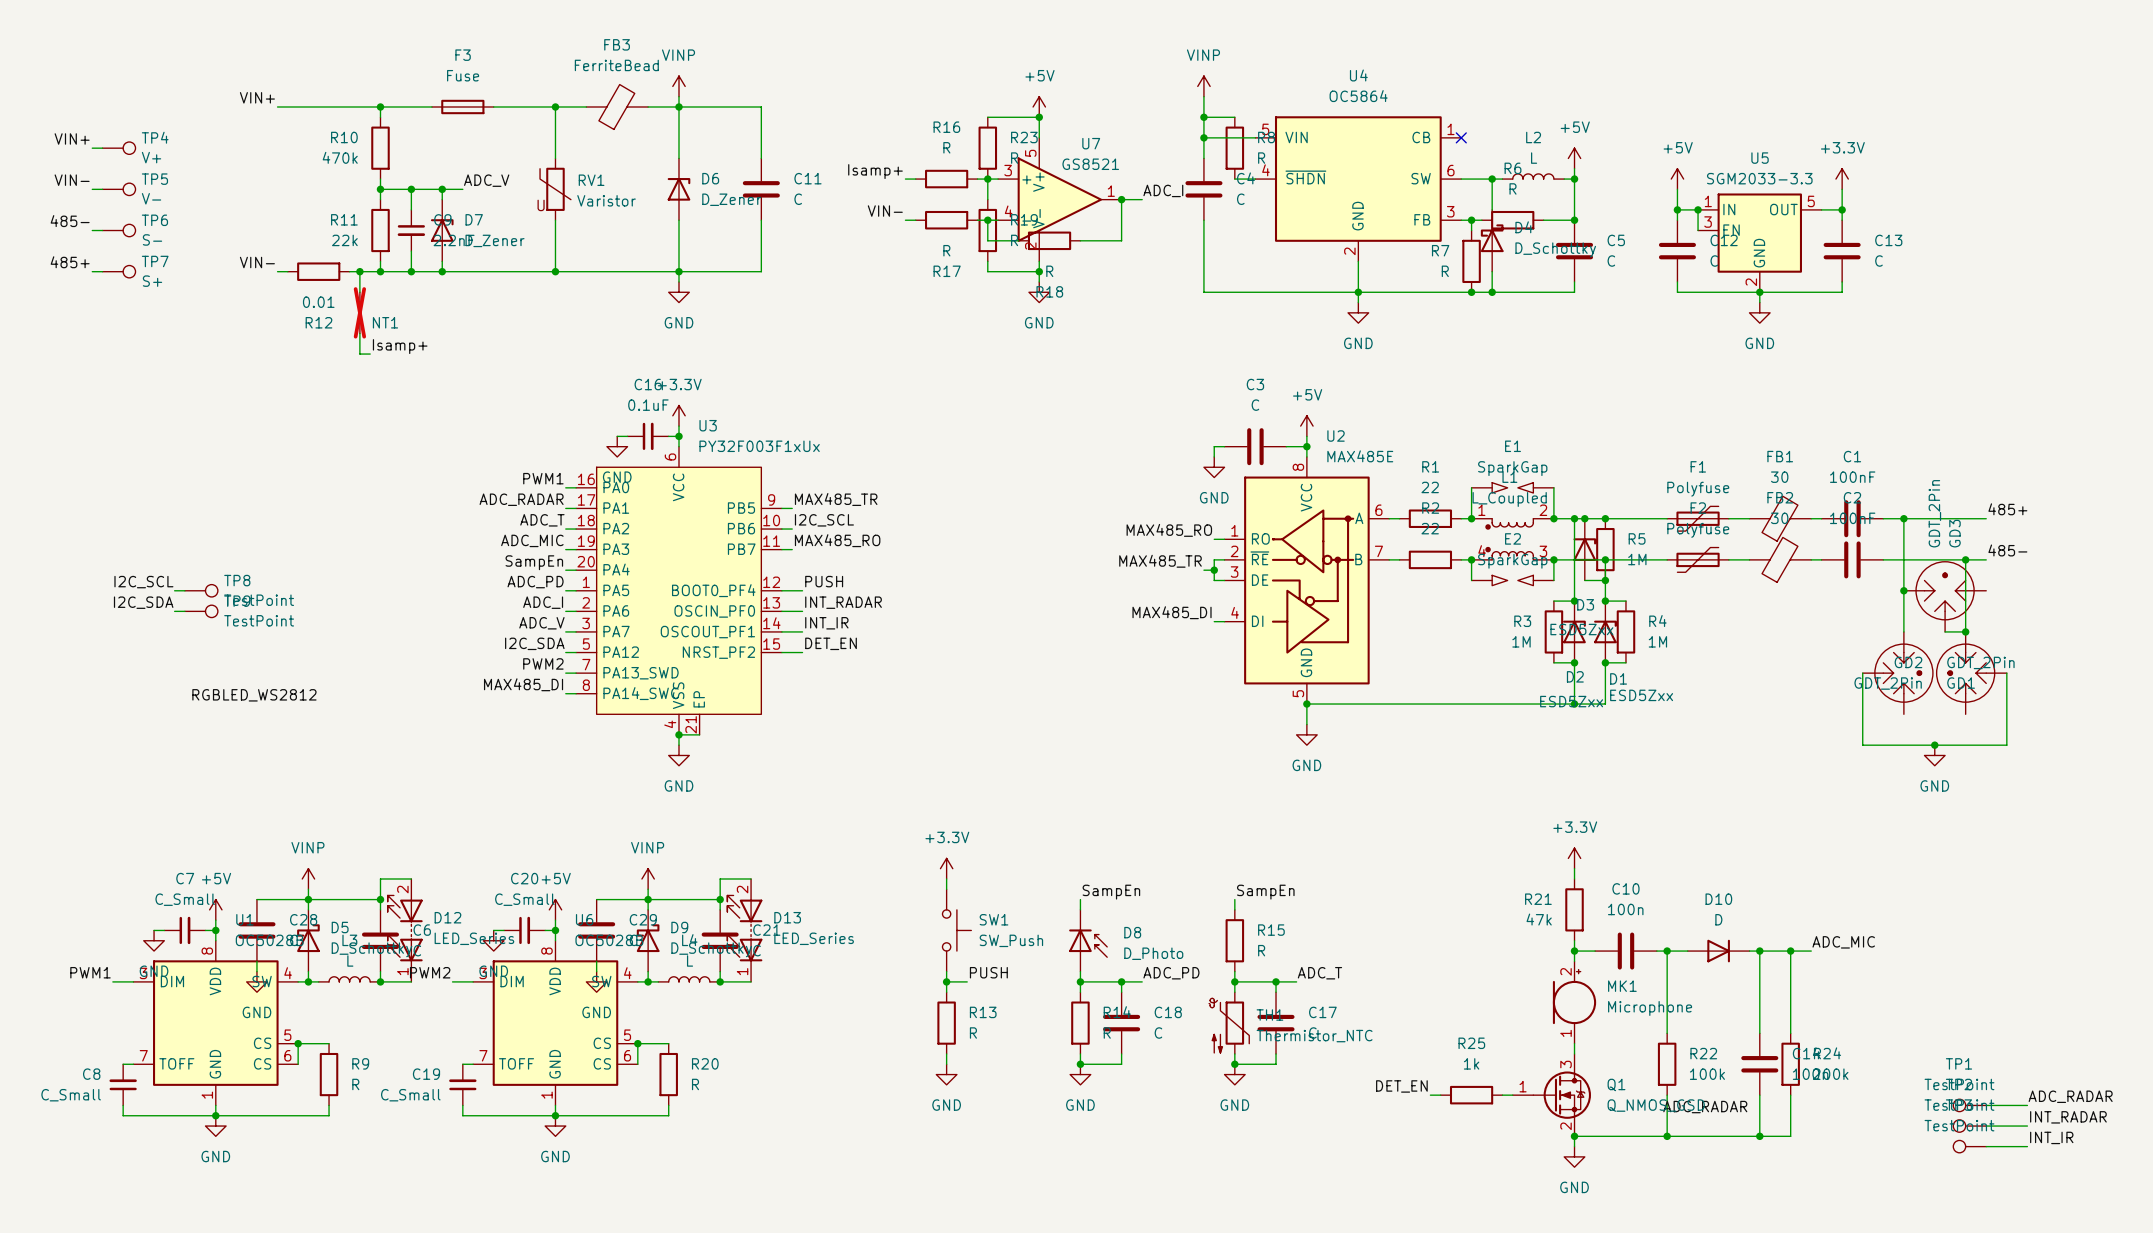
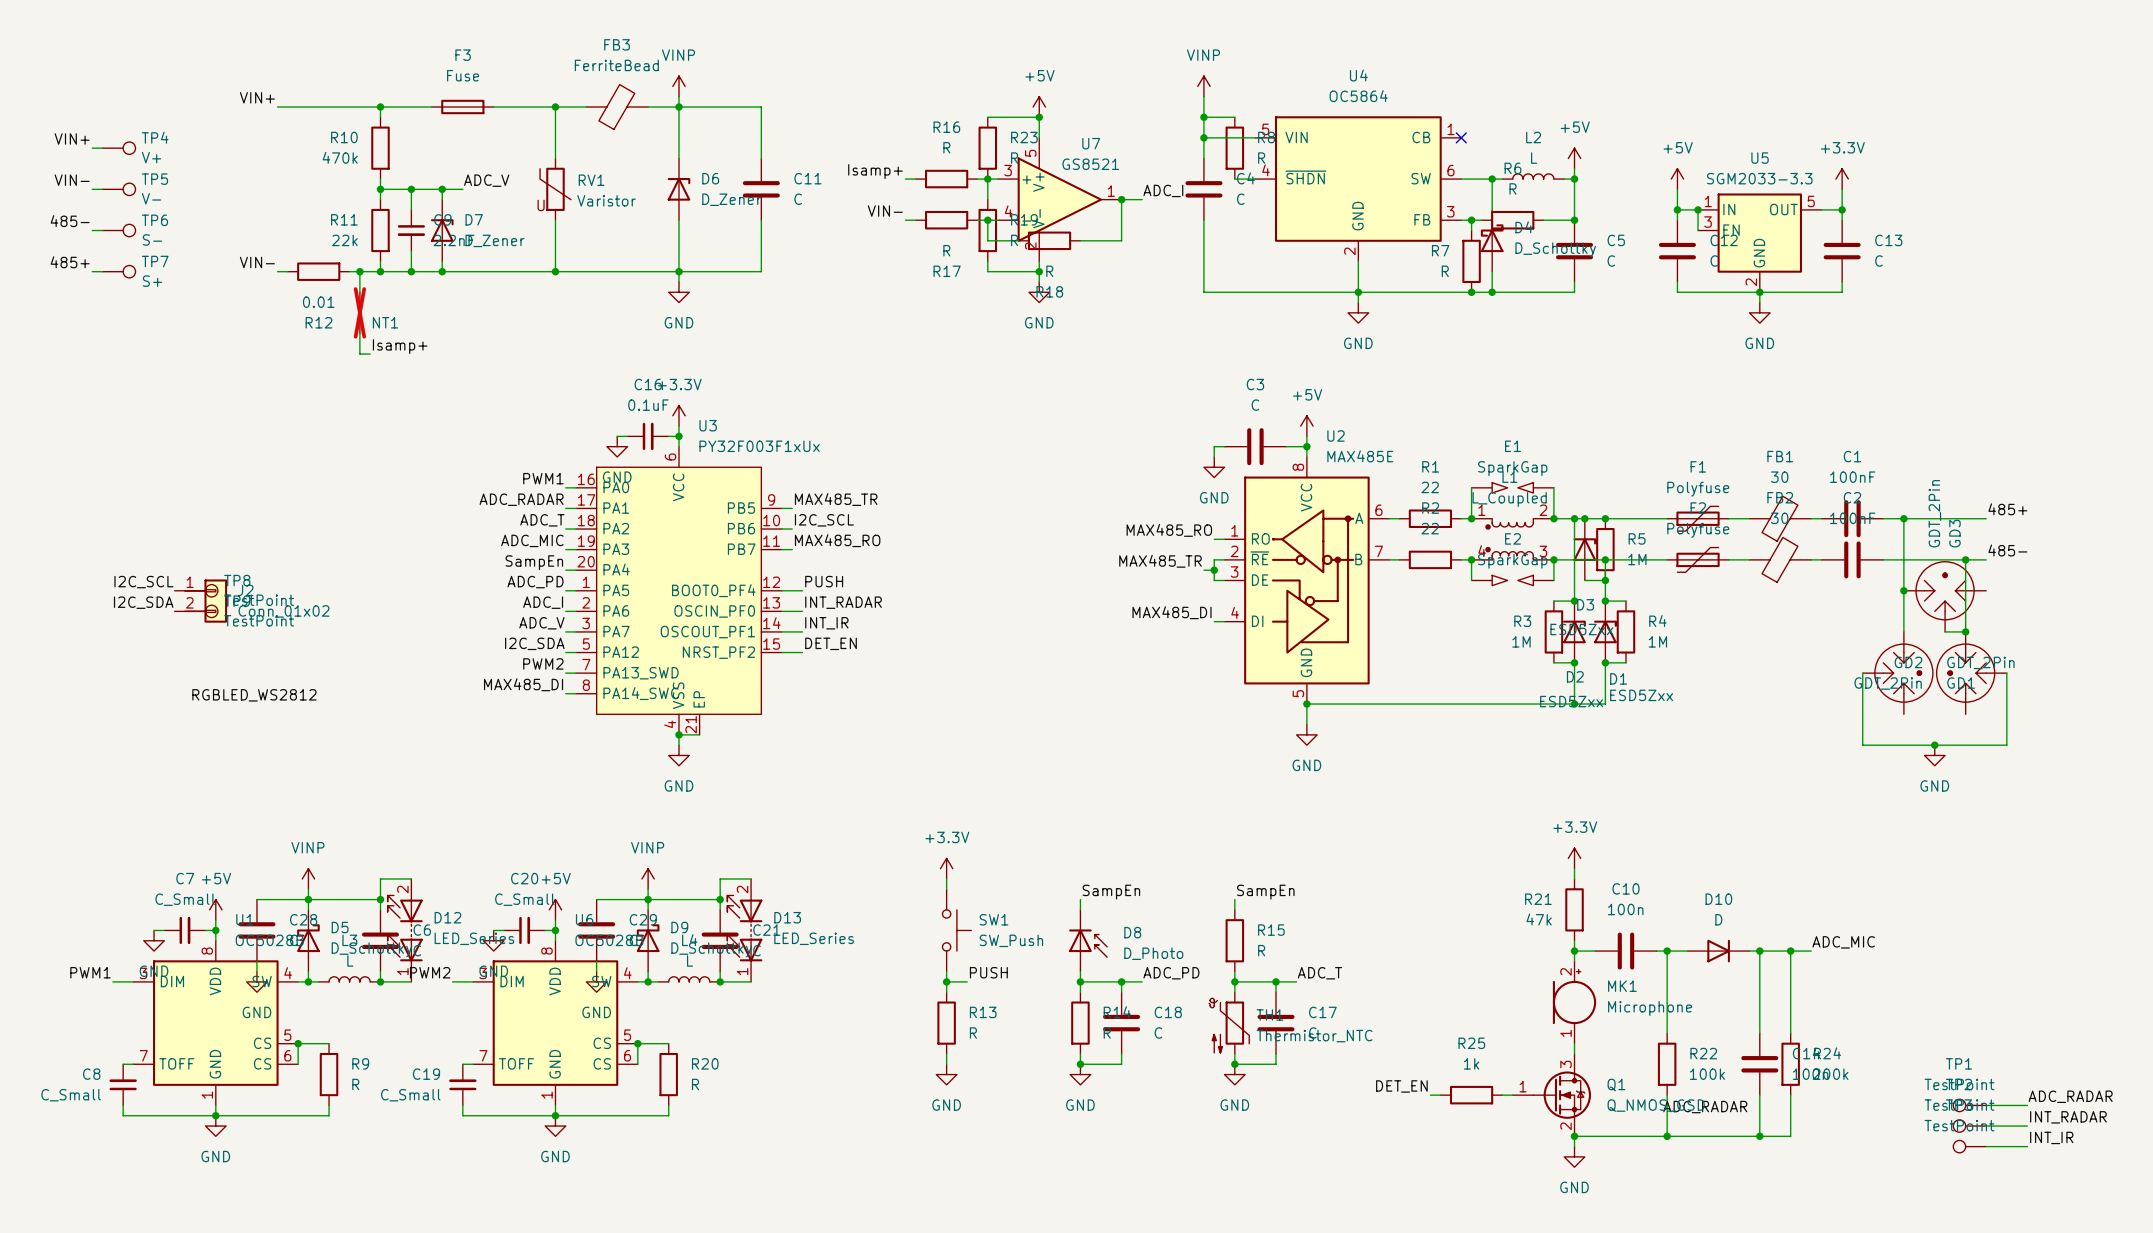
J2: none -> Conn_01x02 (200, 601)

